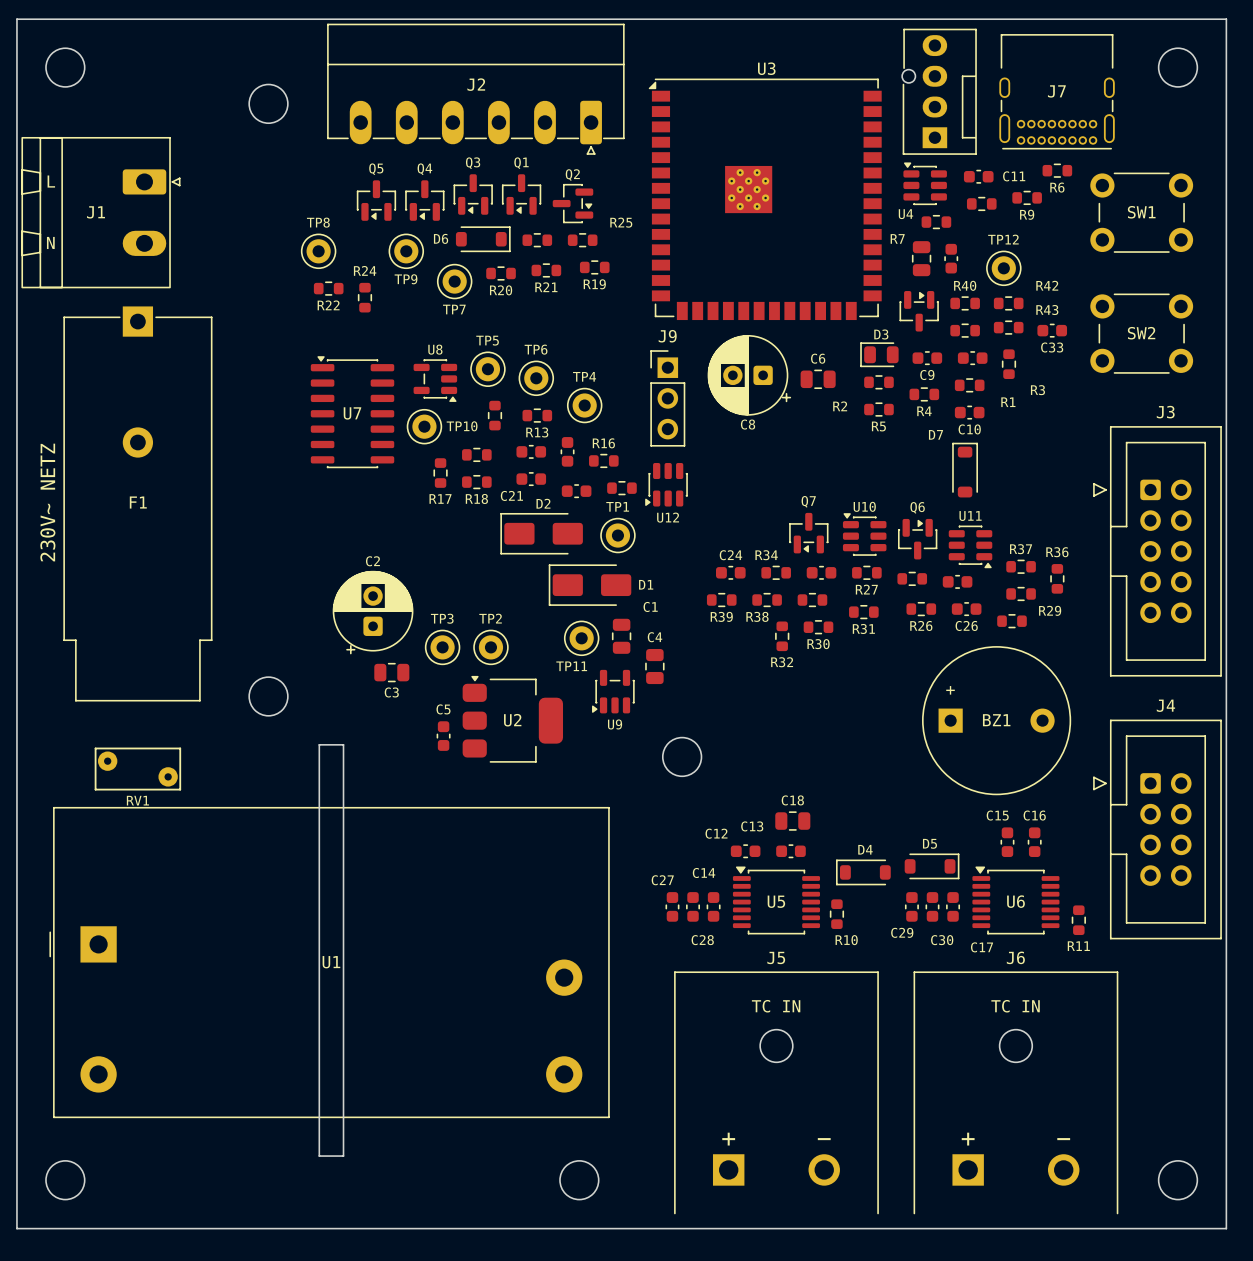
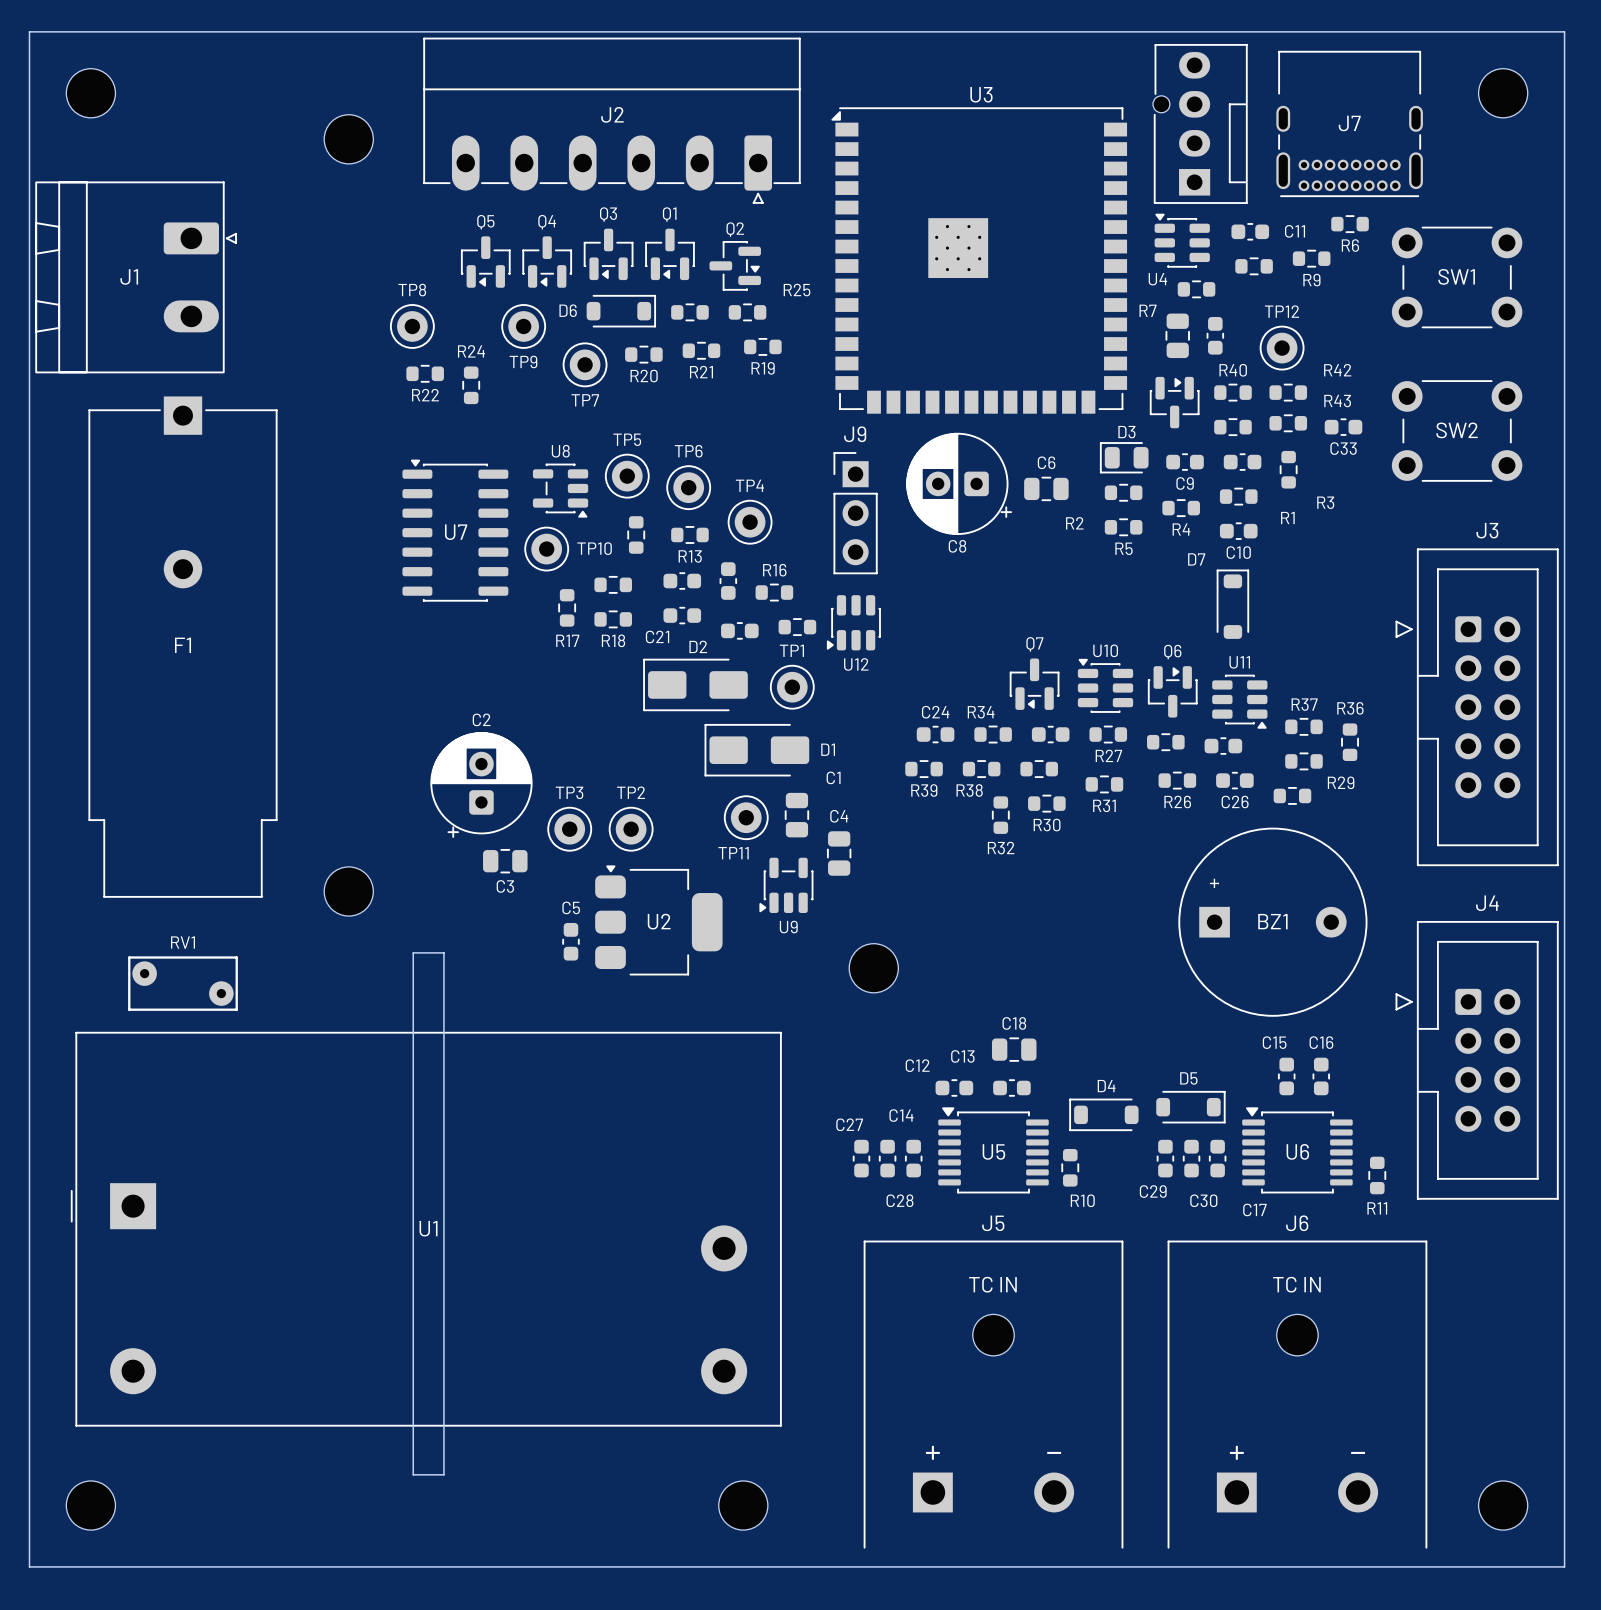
text: L (51, 181) -> none
text: N (50, 242) -> none
text: 230V~ NETZ (47, 502) -> none
RV1 name position: RV1 (137, 800) -> RV1 (183, 942)

